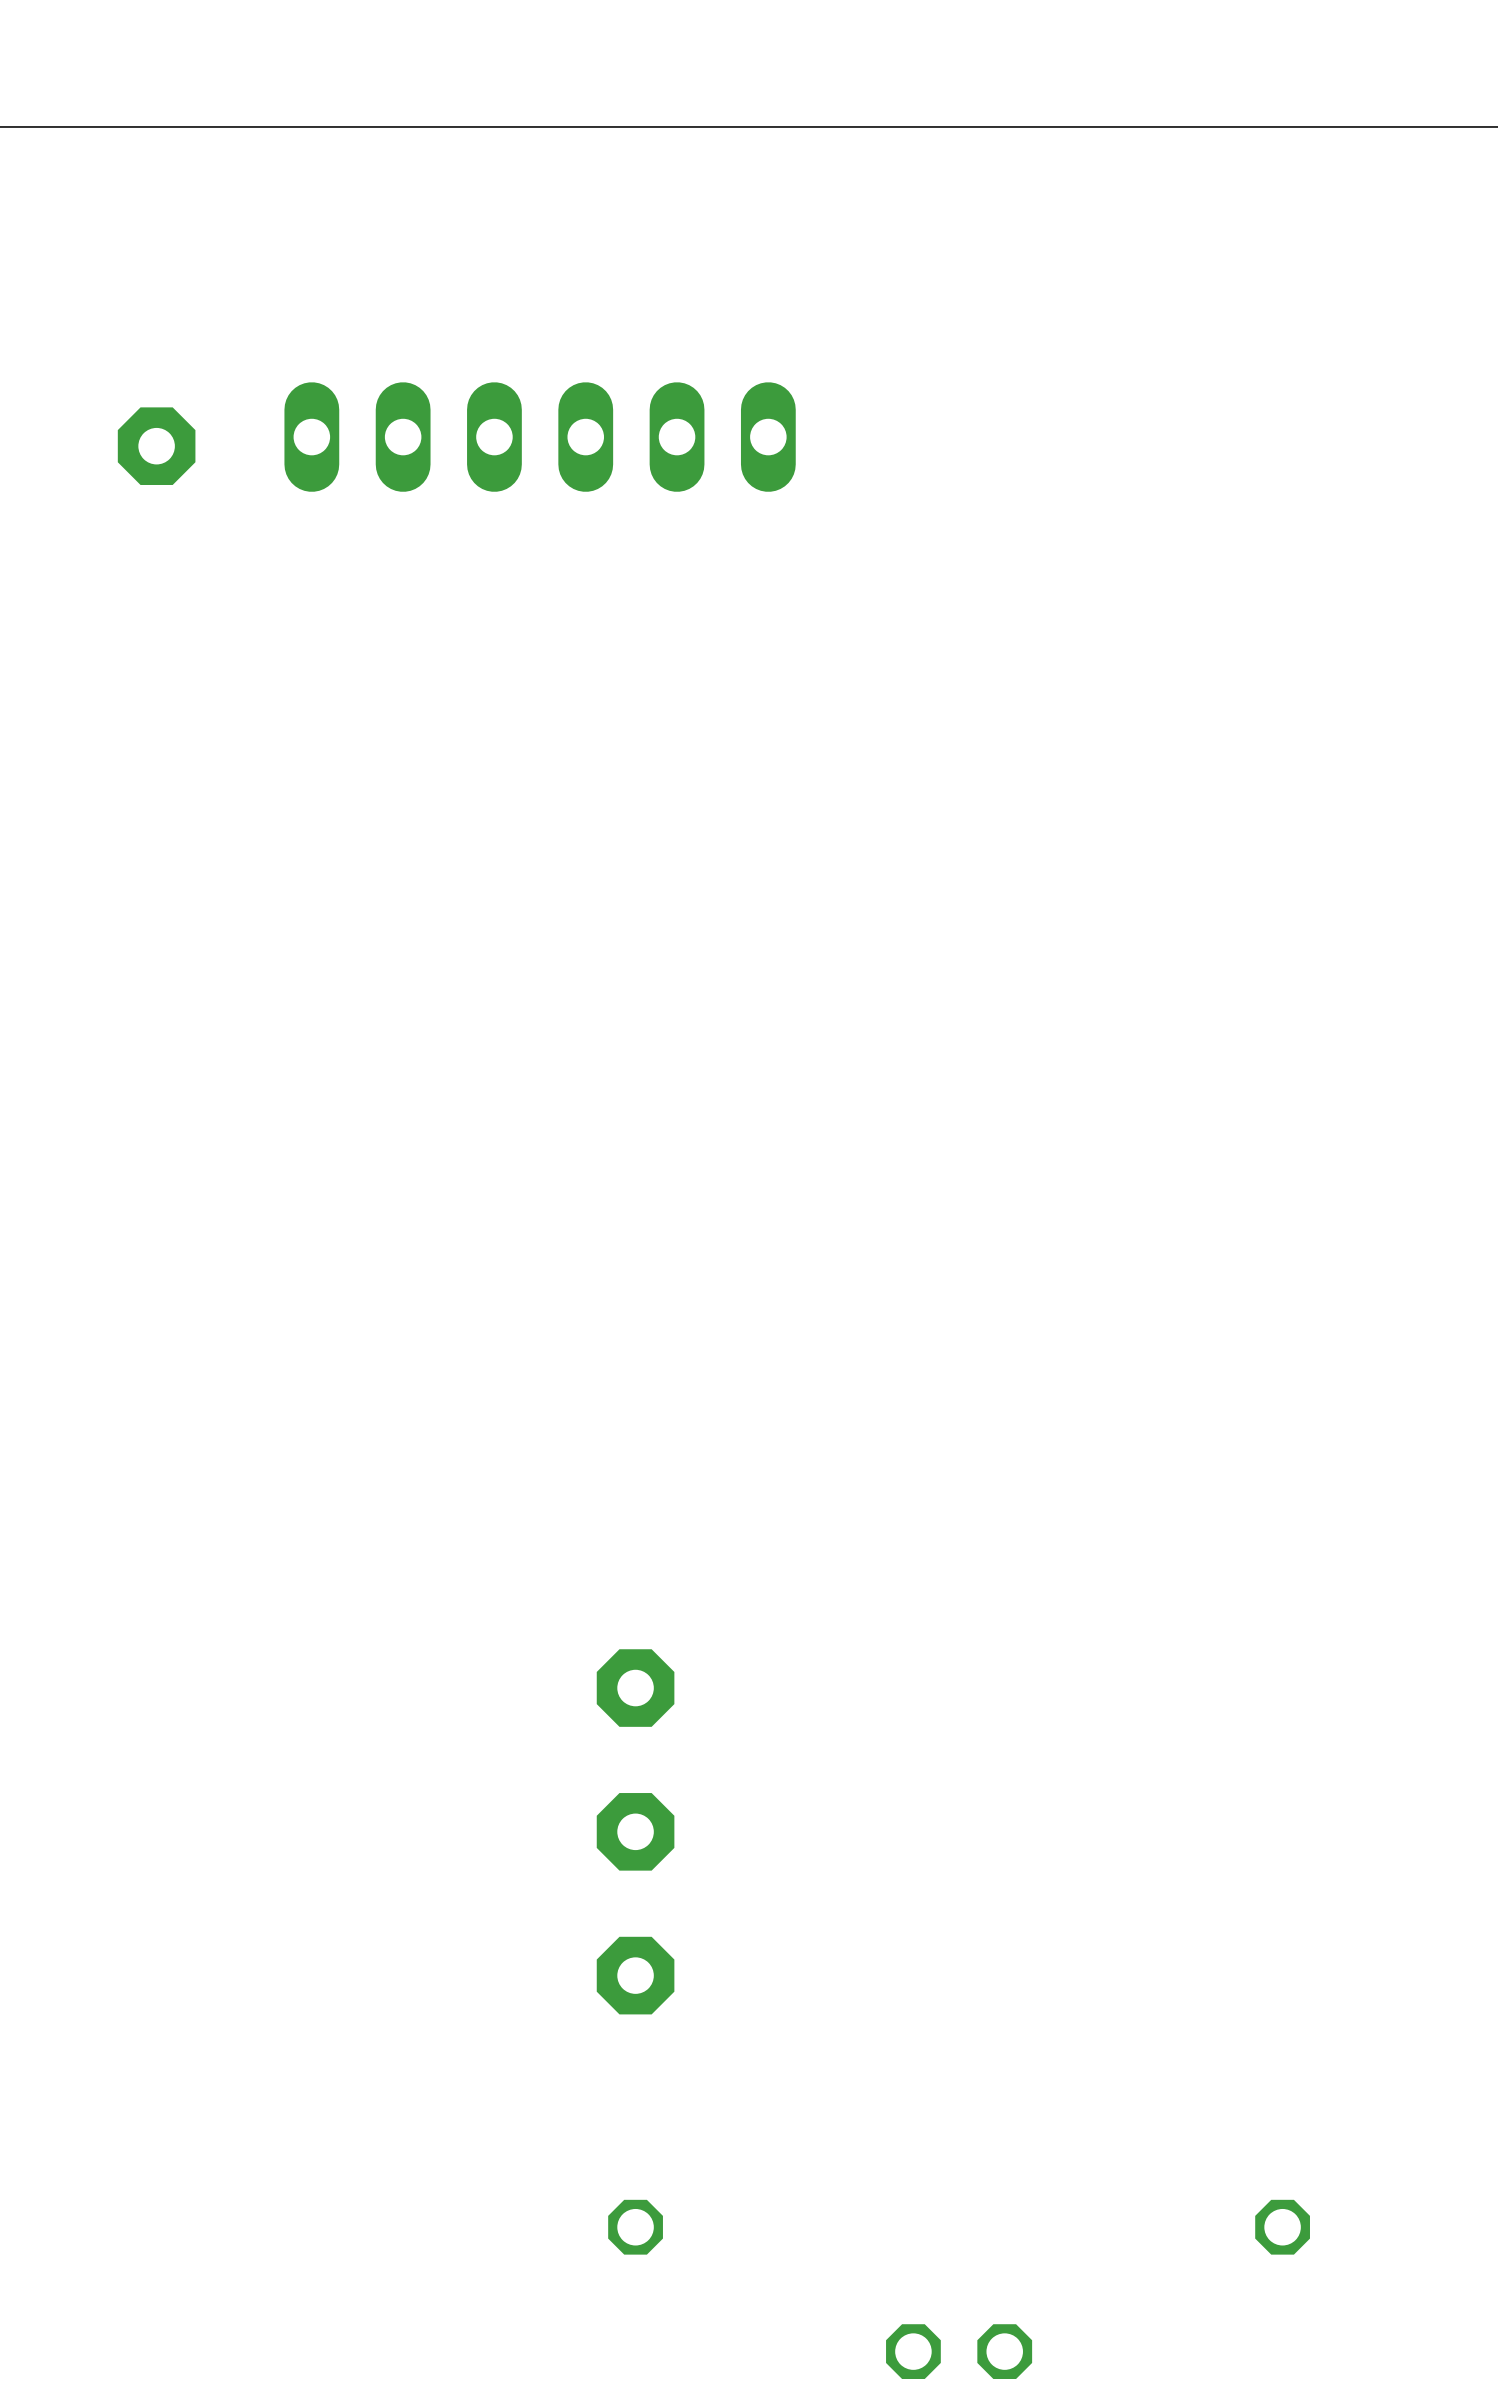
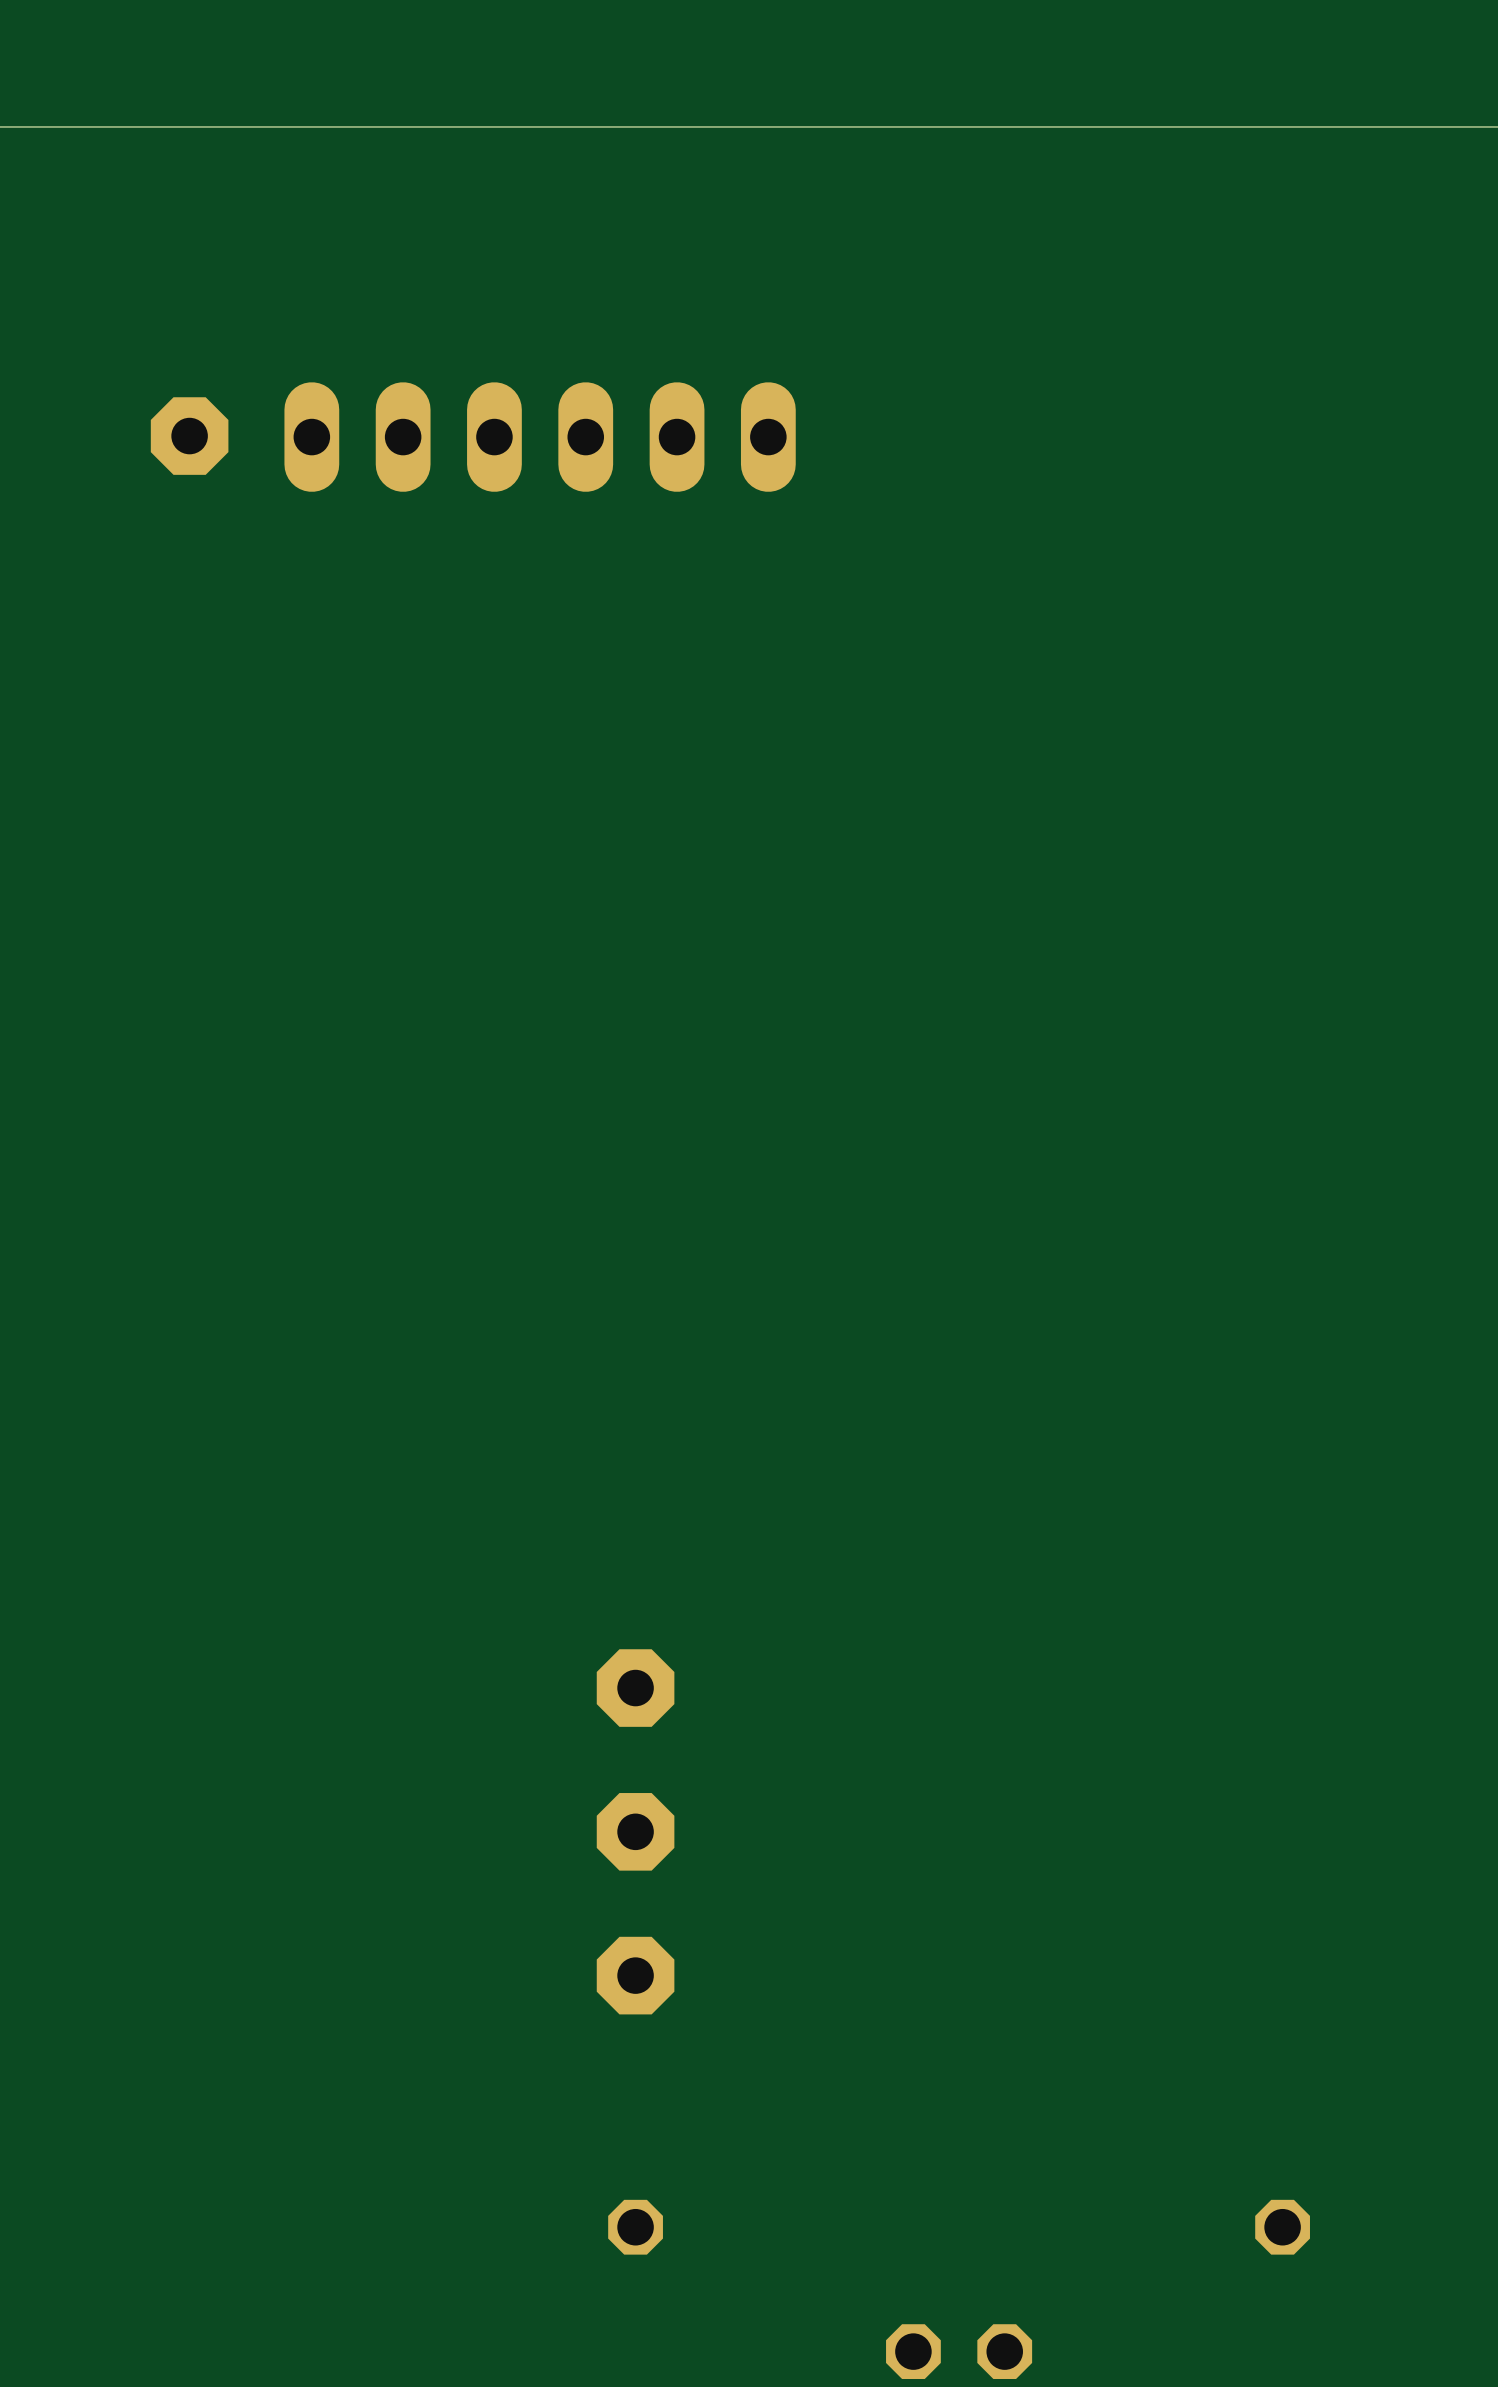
part position: (156, 446) -> (189, 436)

